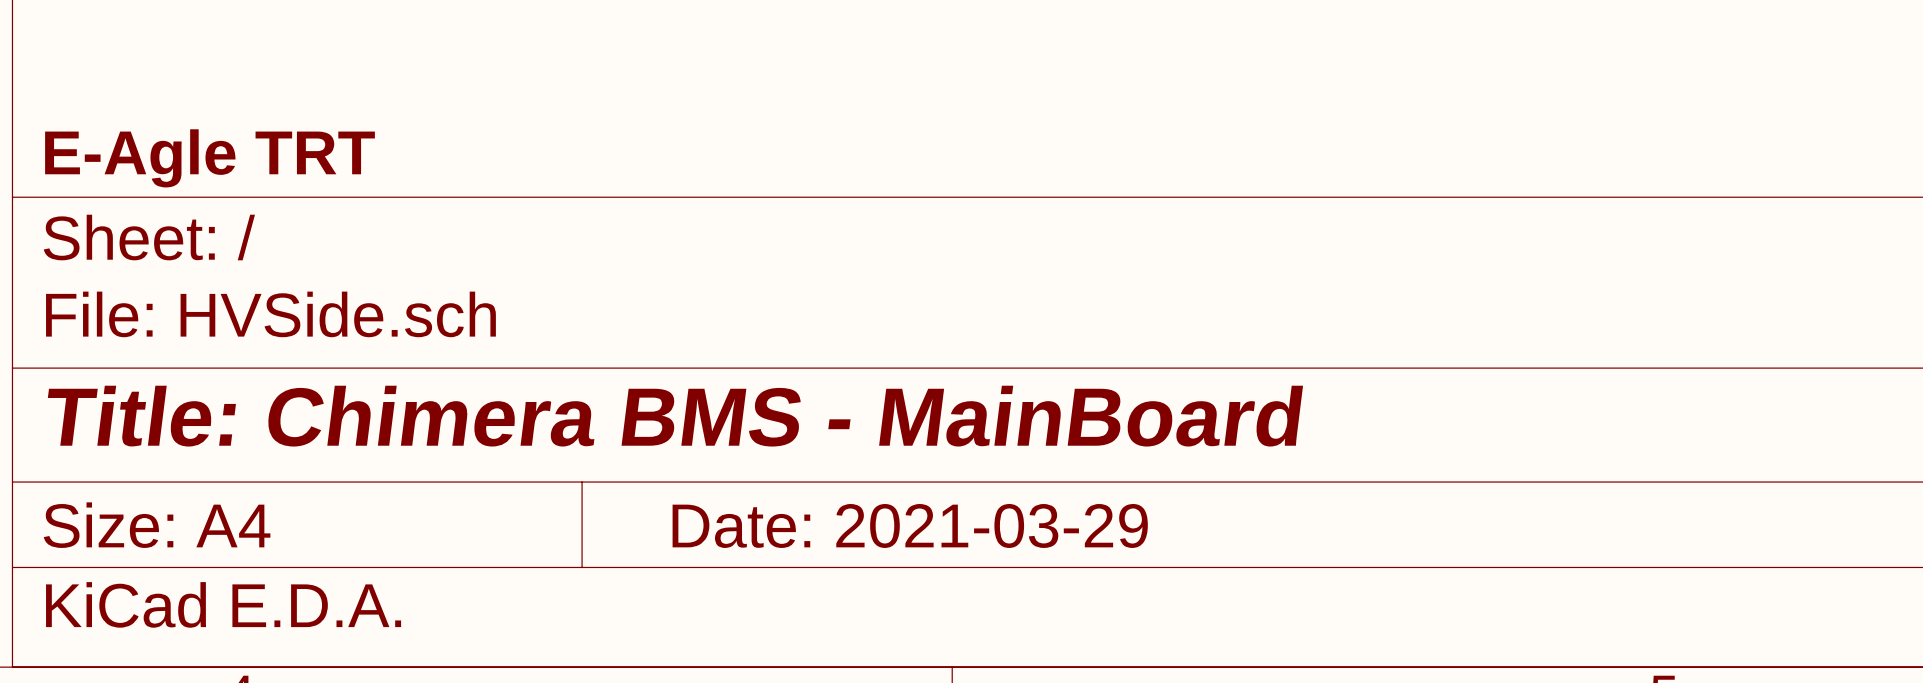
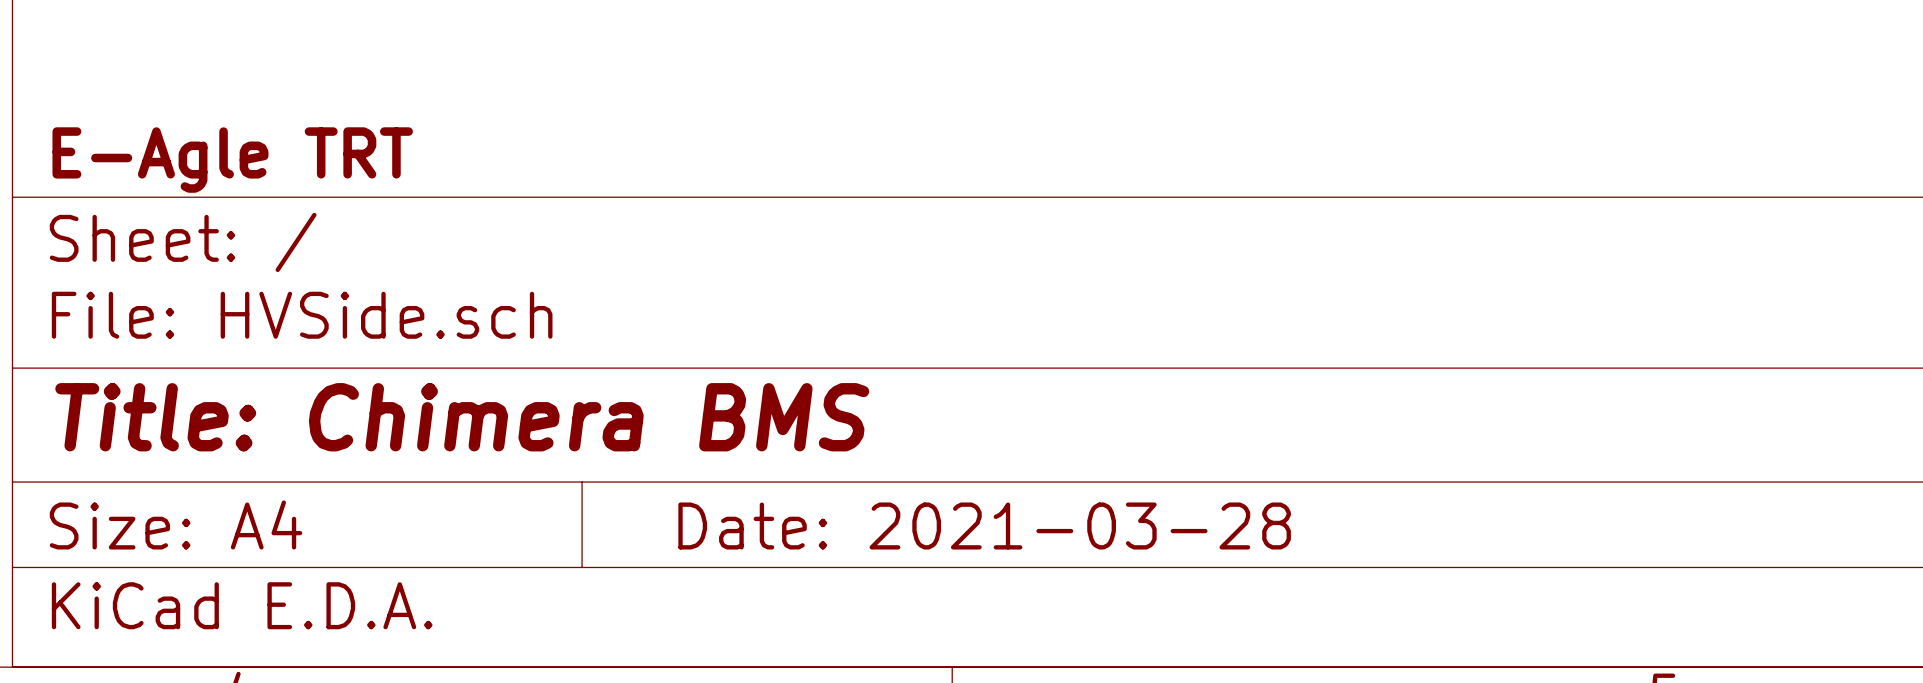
title block: Title: Chimera BMS - MainBoard (675, 416) -> Title: Chimera BMS (462, 417)
title block: Date: 2021-03-29 (910, 525) -> Date: 2021-03-28 (984, 525)

